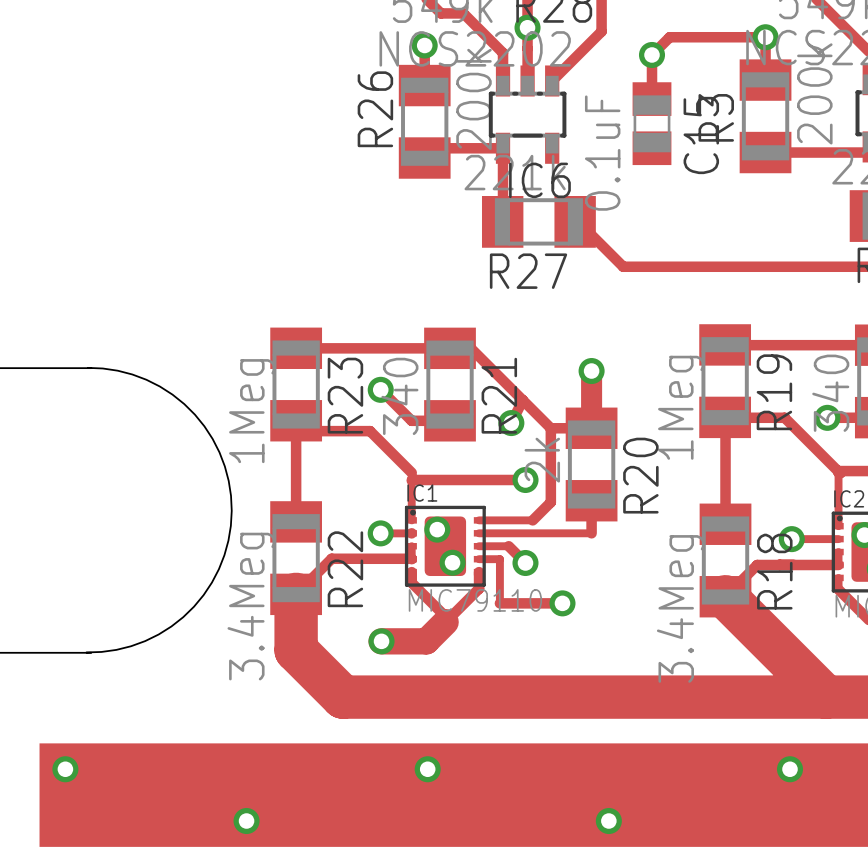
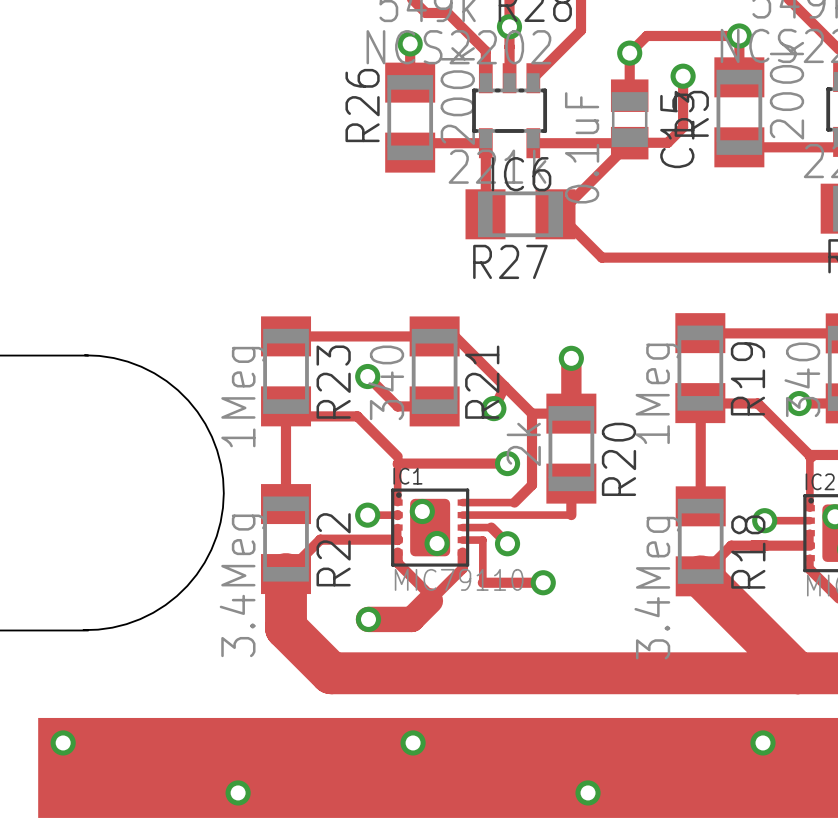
track: none -> (683, 76) (683, 127) (667, 142) (628, 143)
via: none -> (683, 76)
track: none -> (533, 143) (629, 143) (558, 214) (555, 214)

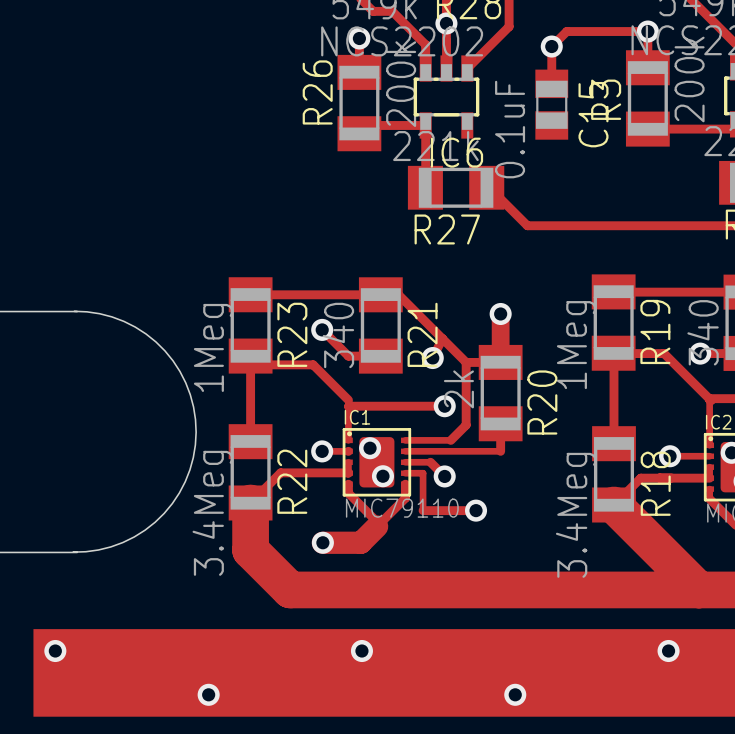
track: (683, 76) (683, 127) (667, 142) (628, 143) -> none
via: (683, 76) -> none
track: (533, 143) (629, 143) (558, 214) (555, 214) -> none

